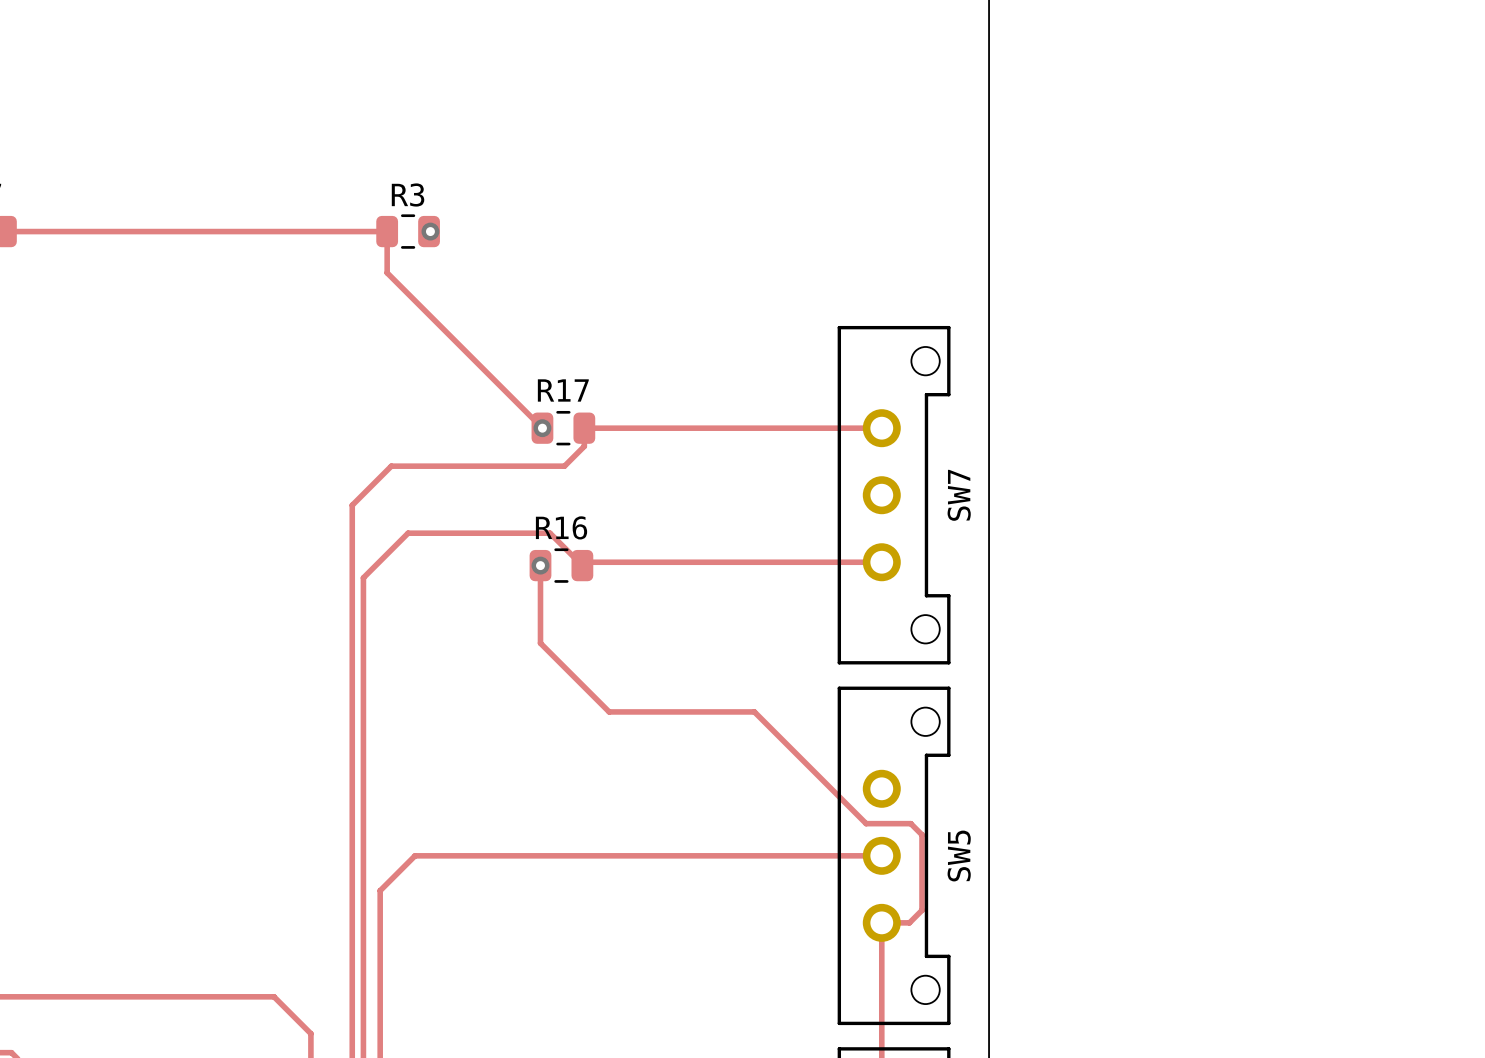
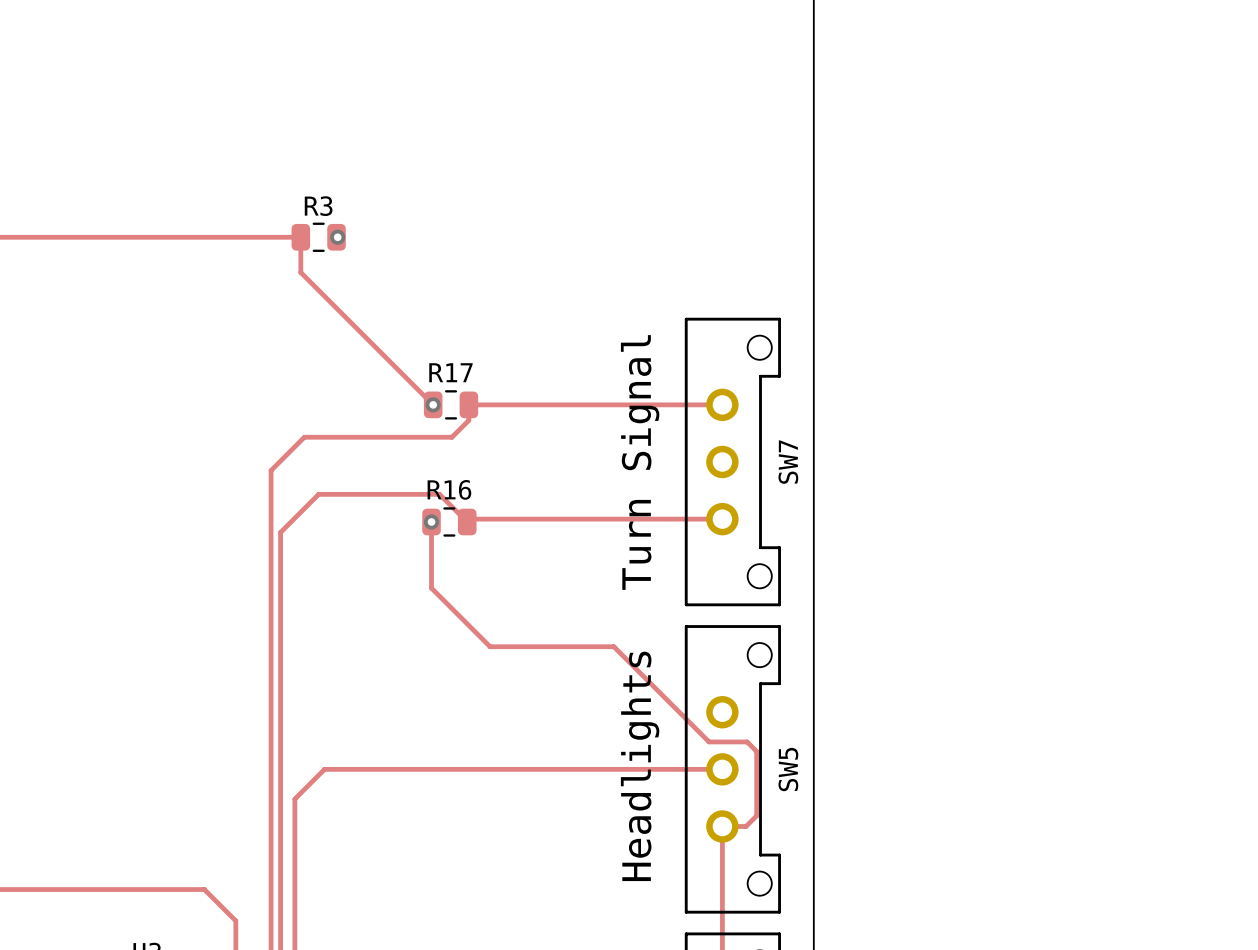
text: none -> Turn Signal (640, 462)
text: none -> Headlights (640, 766)

